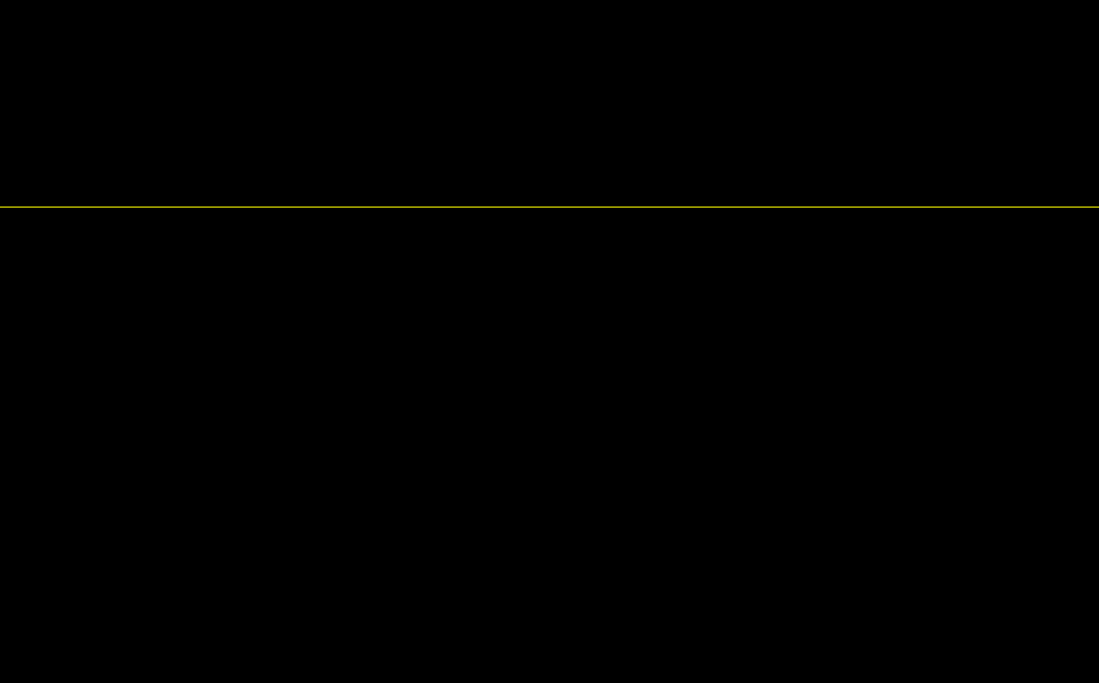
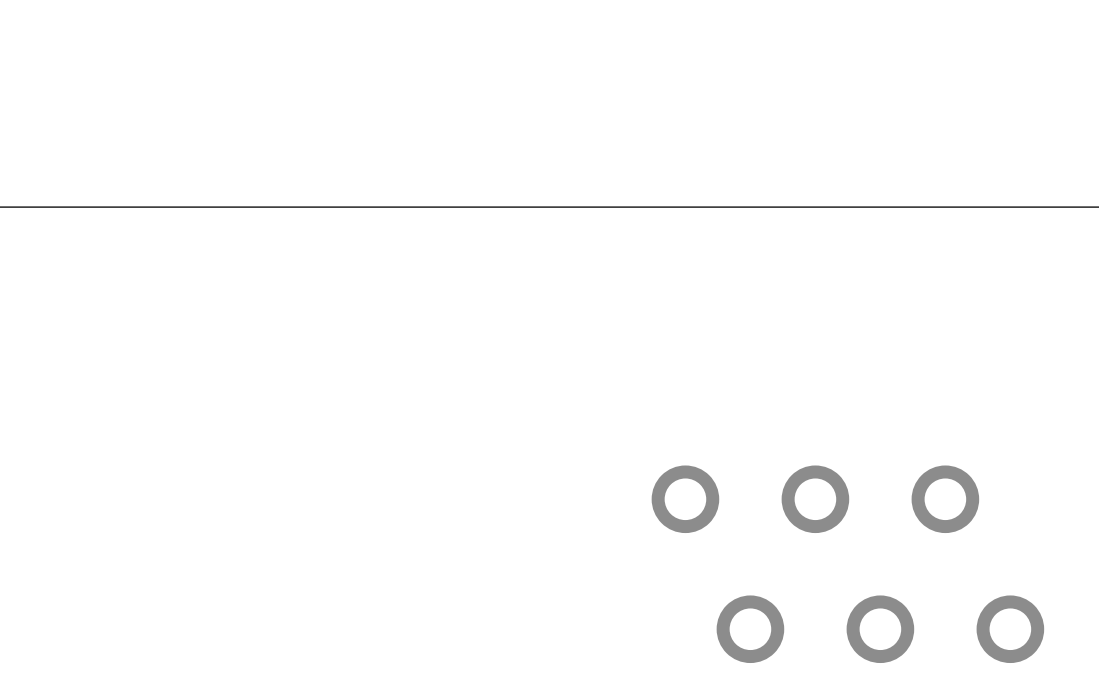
part: none -> (847, 564)

